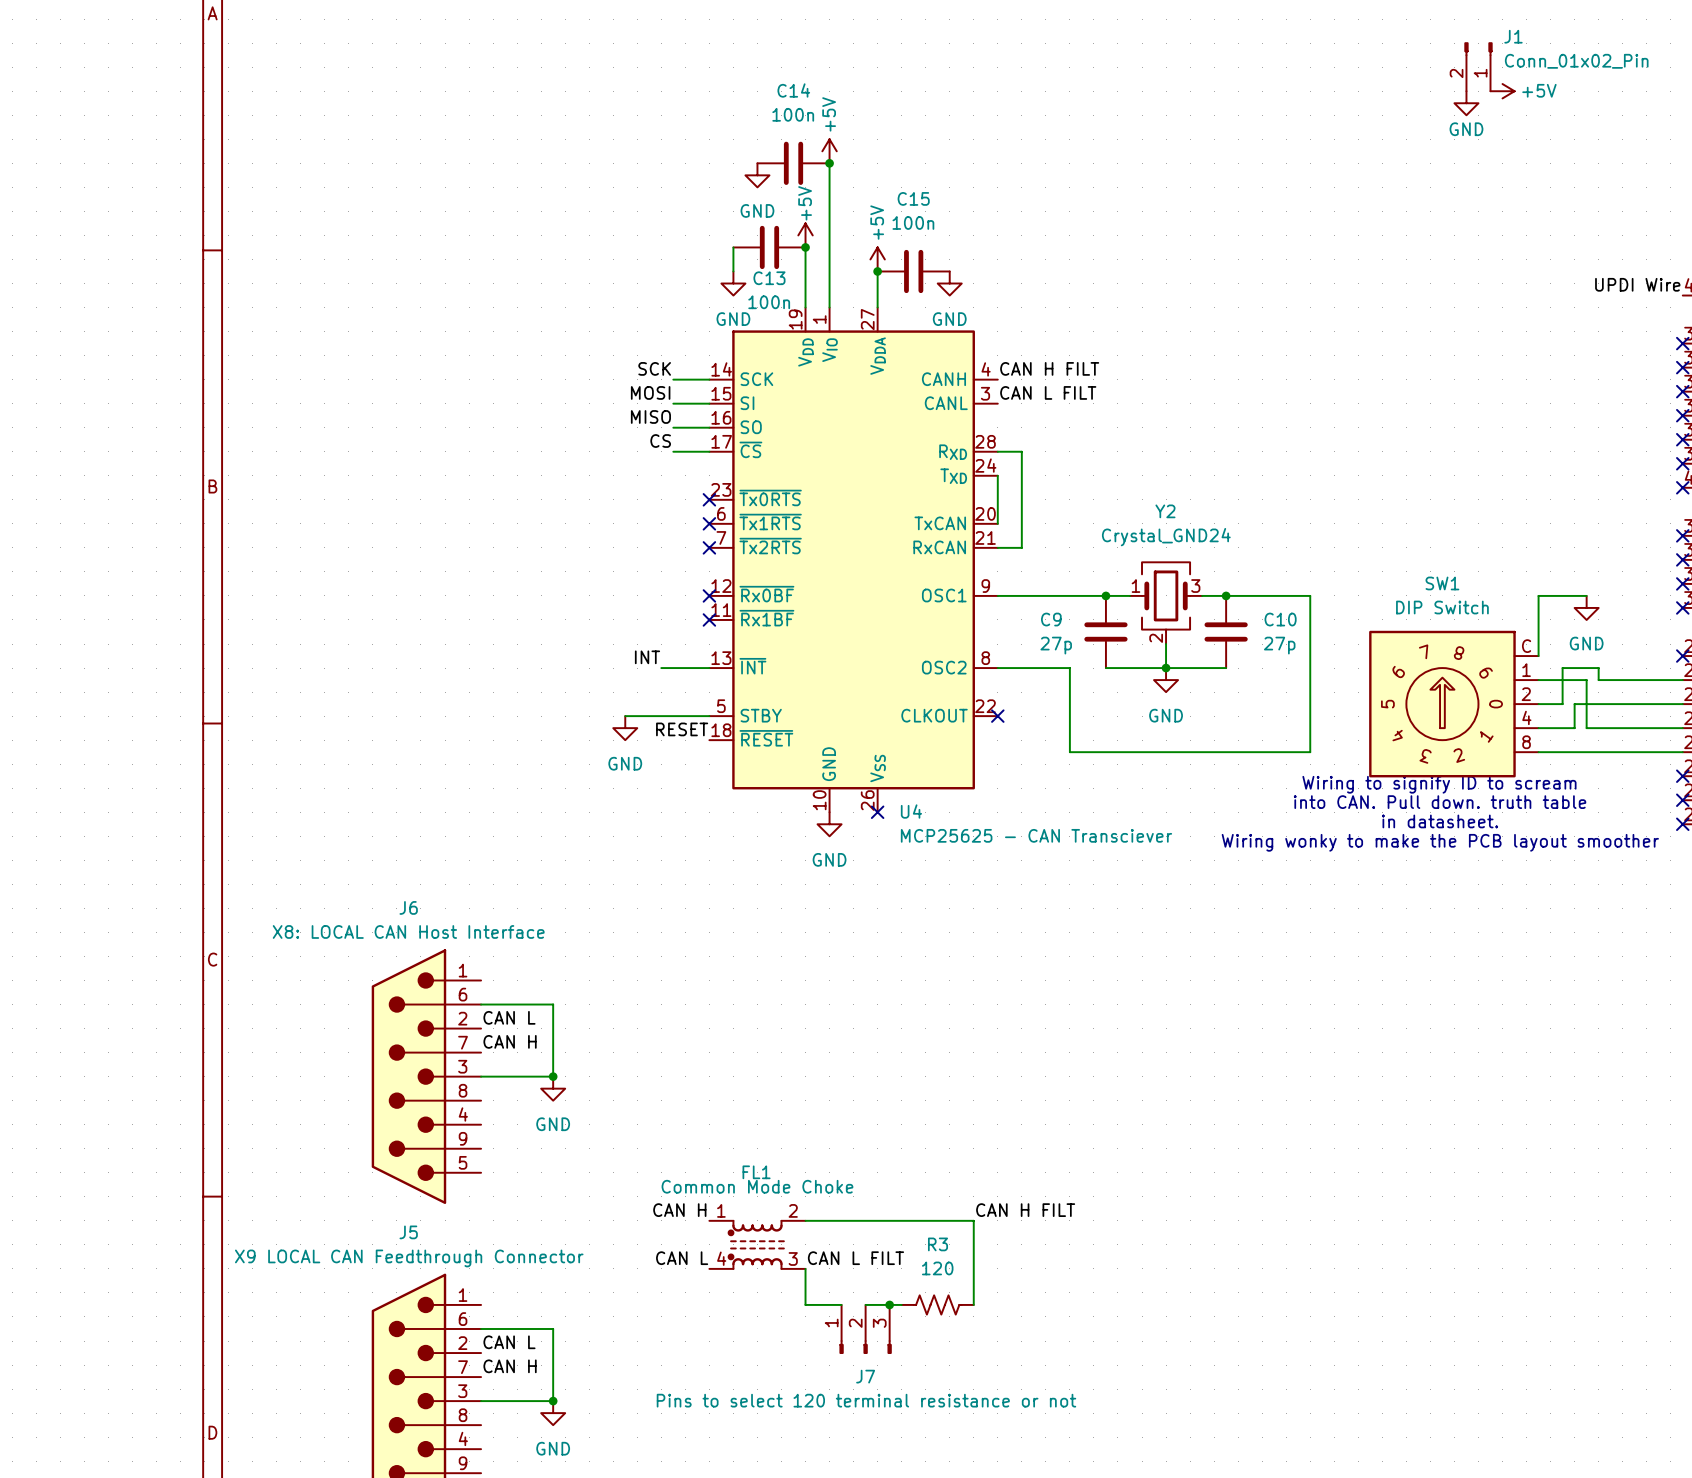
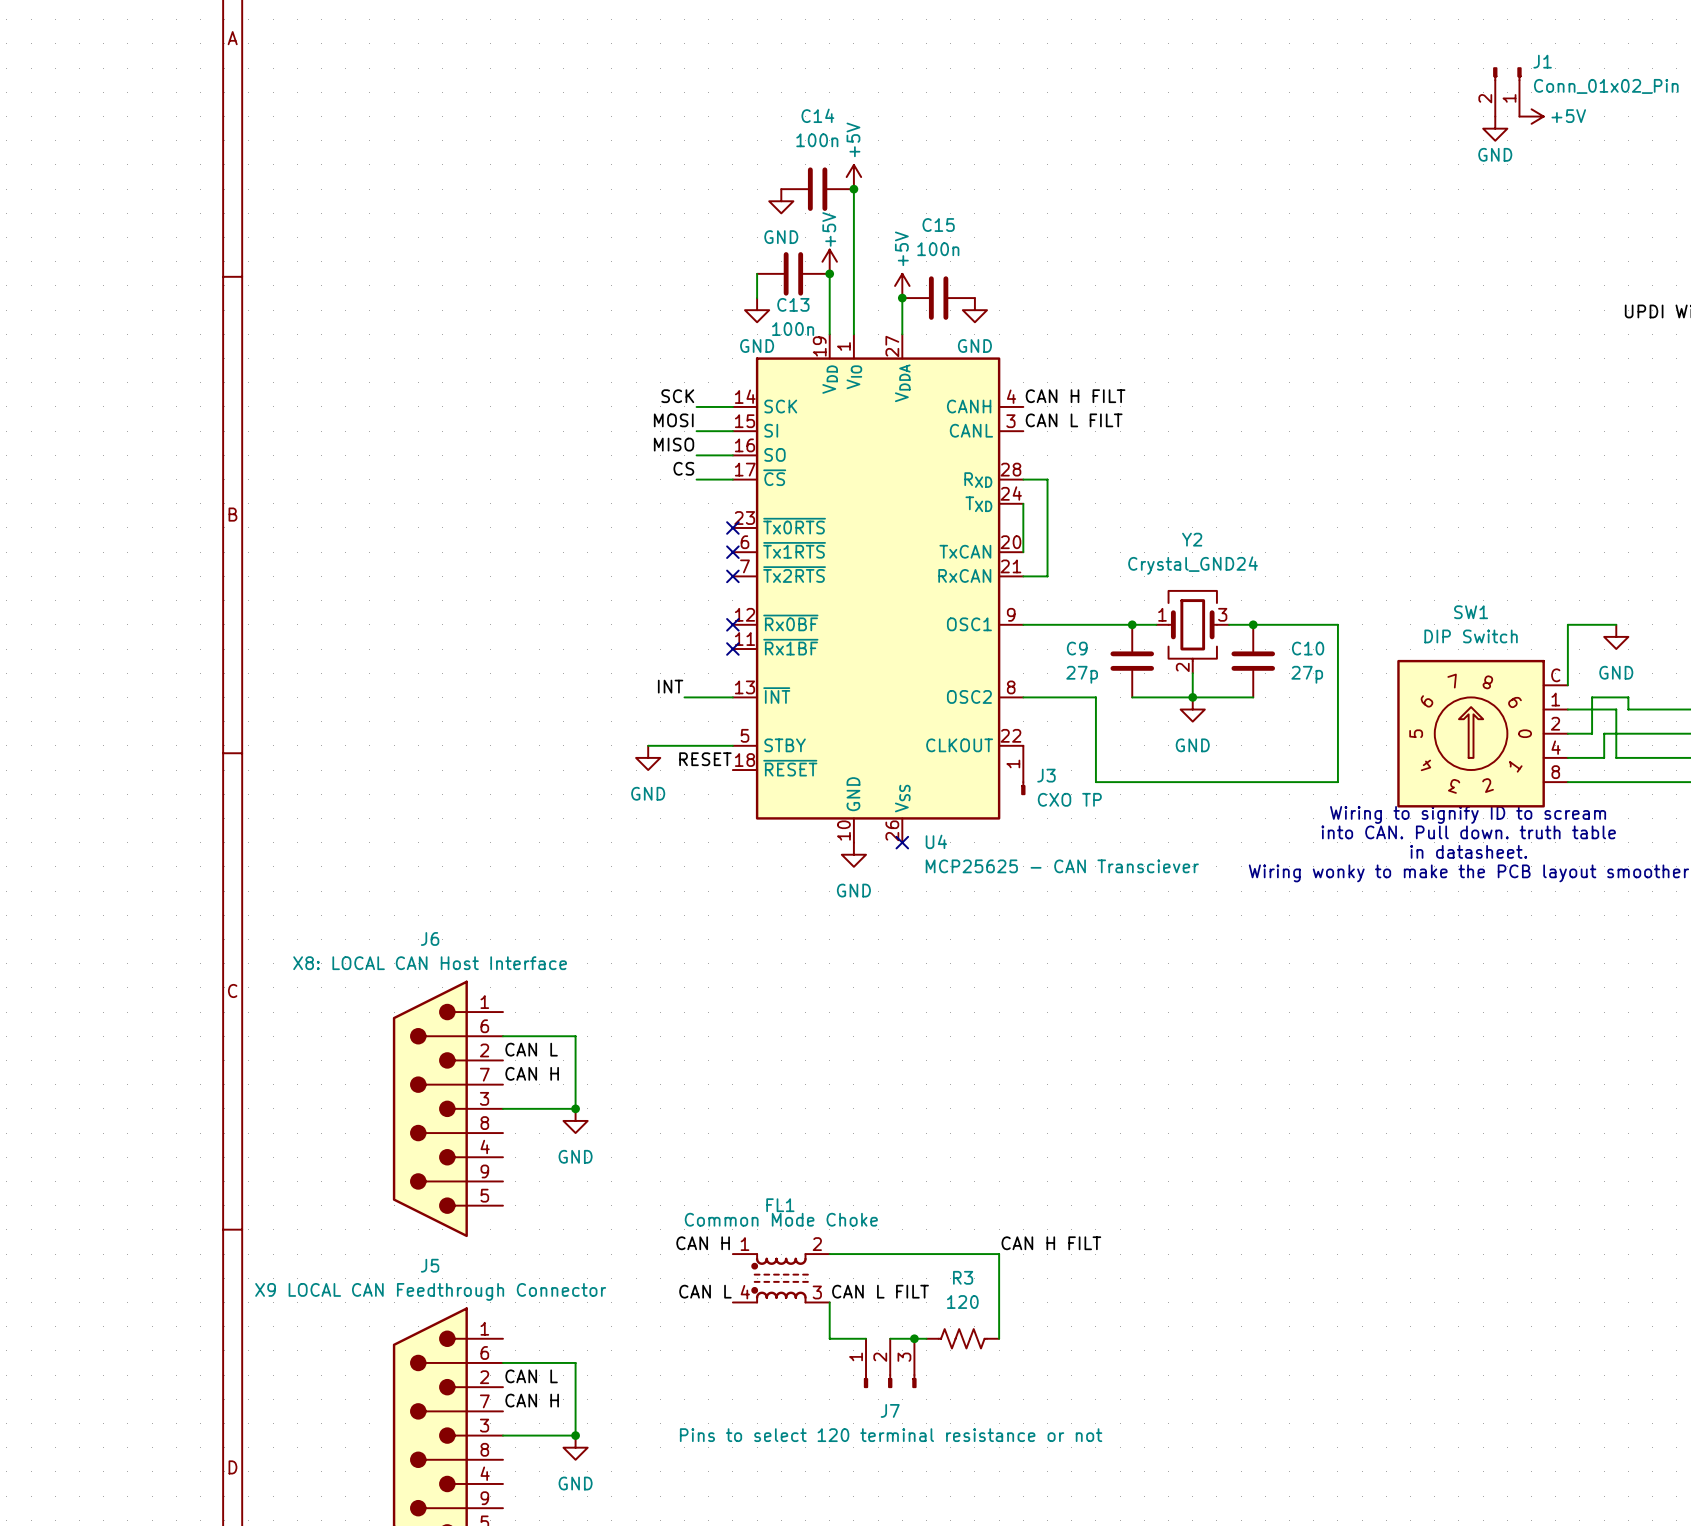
no-connect mark: (997, 716) -> none
J3: none -> CXO TP (1023, 770)

